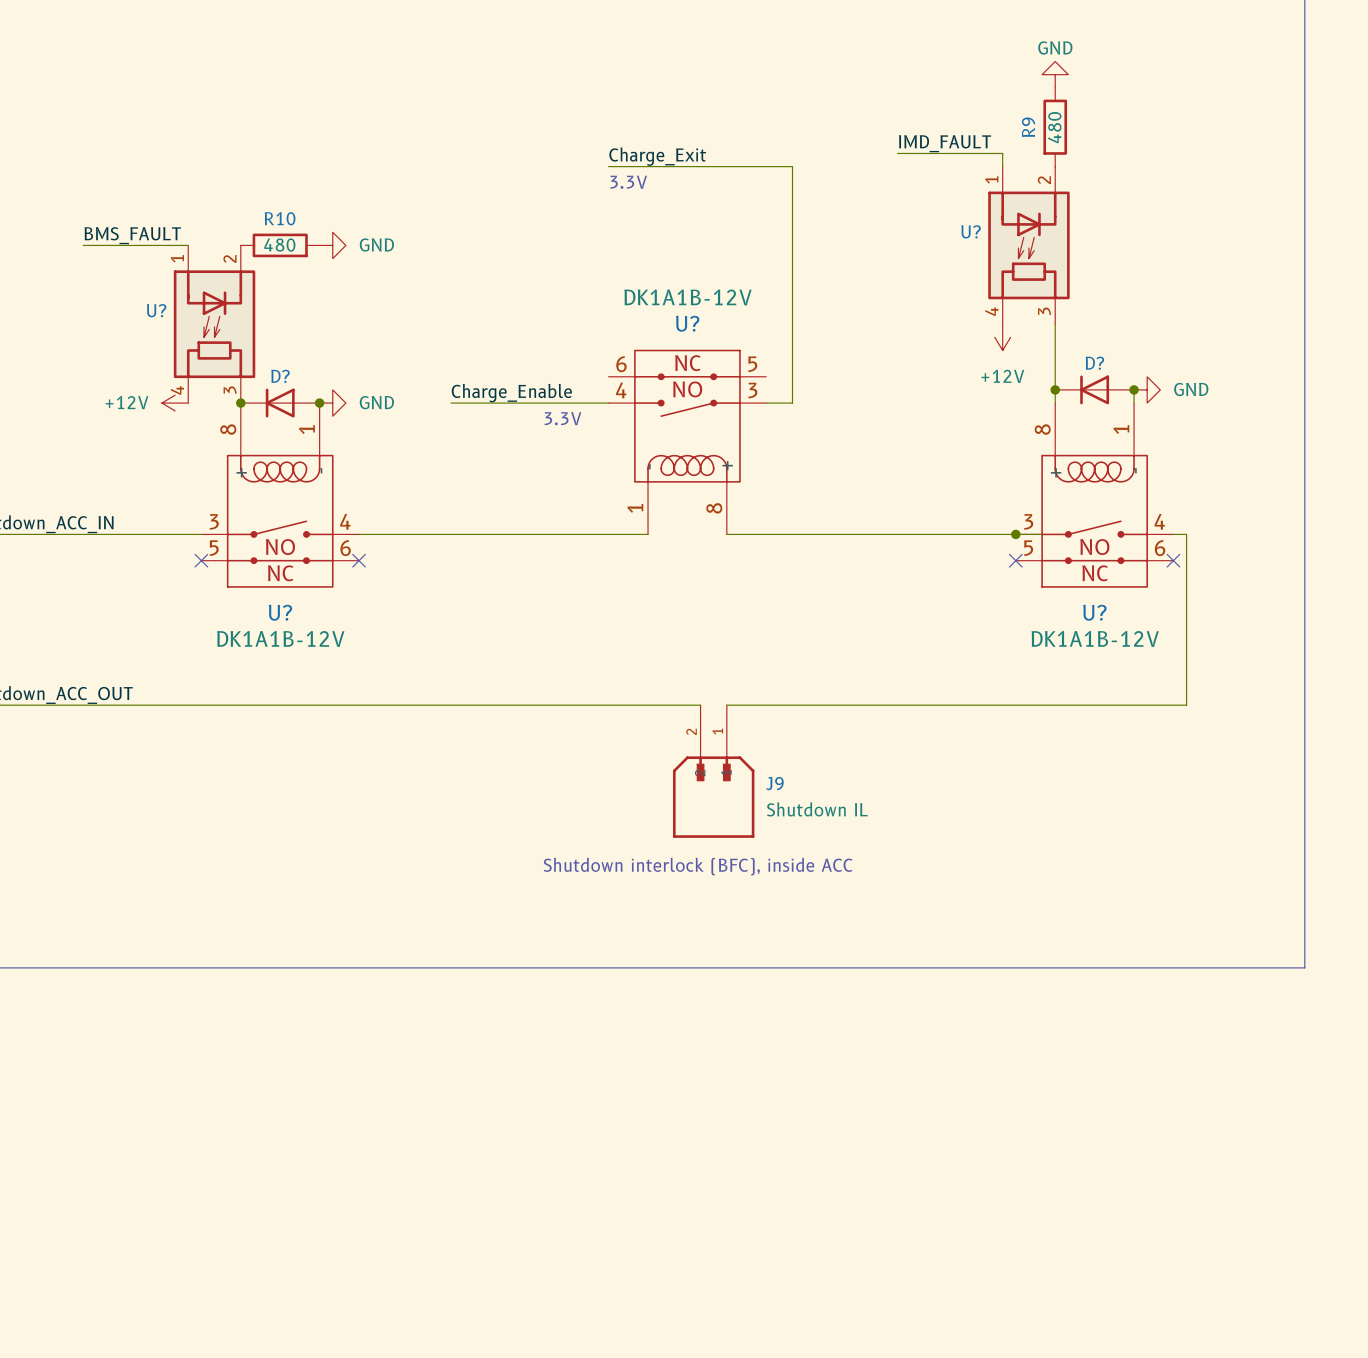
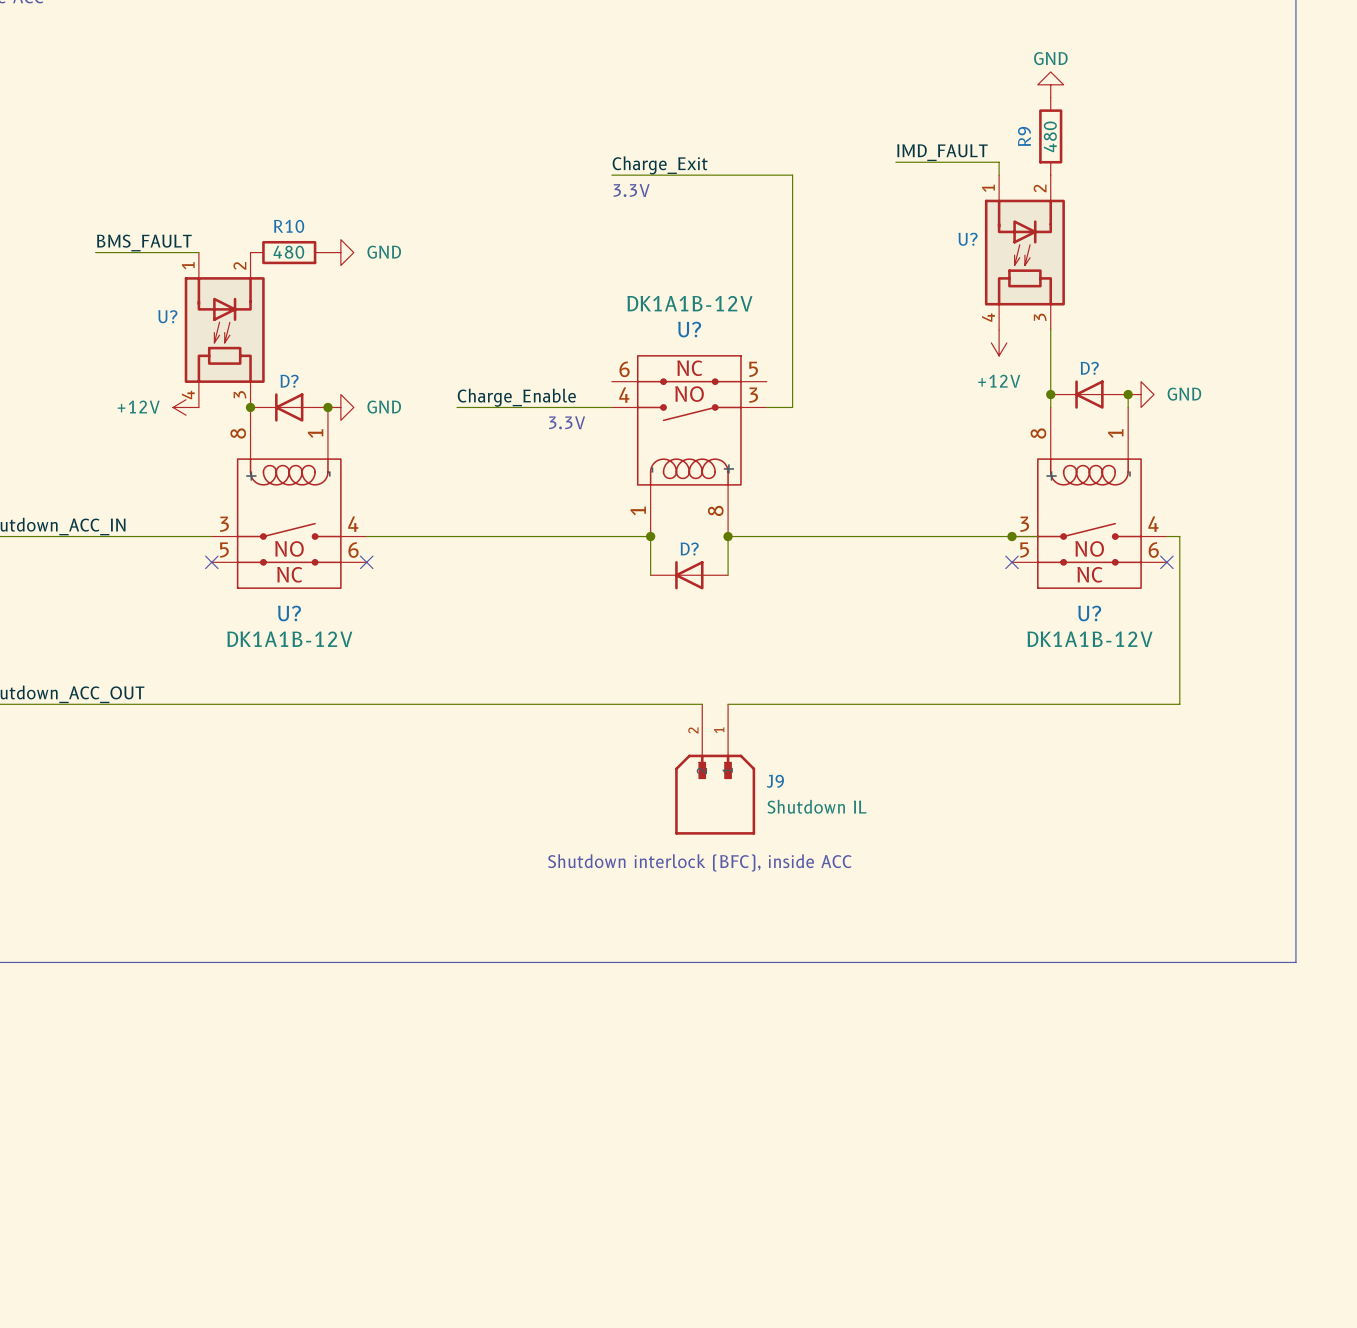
wire: none -> (650, 536) (650, 575)
junction: none -> (650, 536)
wire: none -> (728, 536) (728, 575)
junction: none -> (728, 536)
D?: none -> (689, 575)

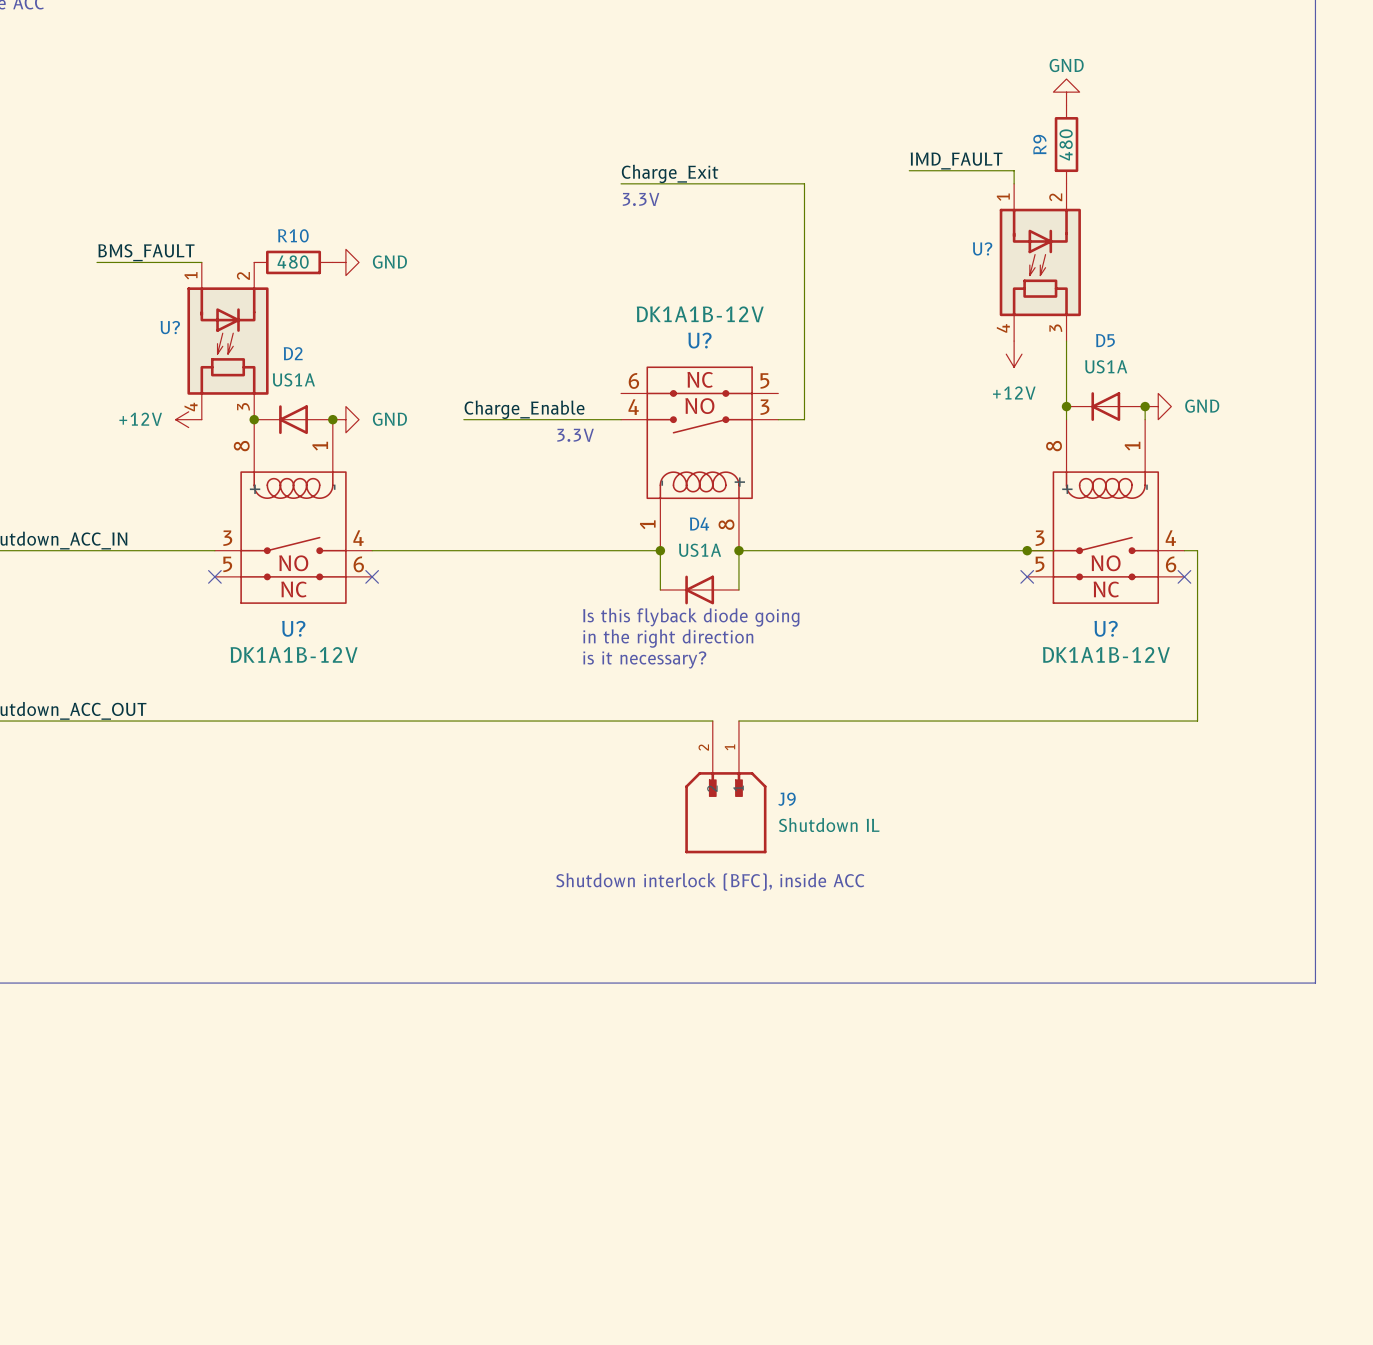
D? value: none -> US1A (1106, 366)
D? value: none -> US1A (293, 379)
D? name: D? (1089, 368) -> D5 (1105, 340)
D? name: D? (289, 381) -> D2 (293, 353)
D? value: none -> US1A (700, 550)
D? name: D? (689, 549) -> D4 (699, 523)
text: none -> Is this flyback diode going (691, 617)
text: none -> in the right direction (668, 638)
text: none -> is it necessary? (644, 659)

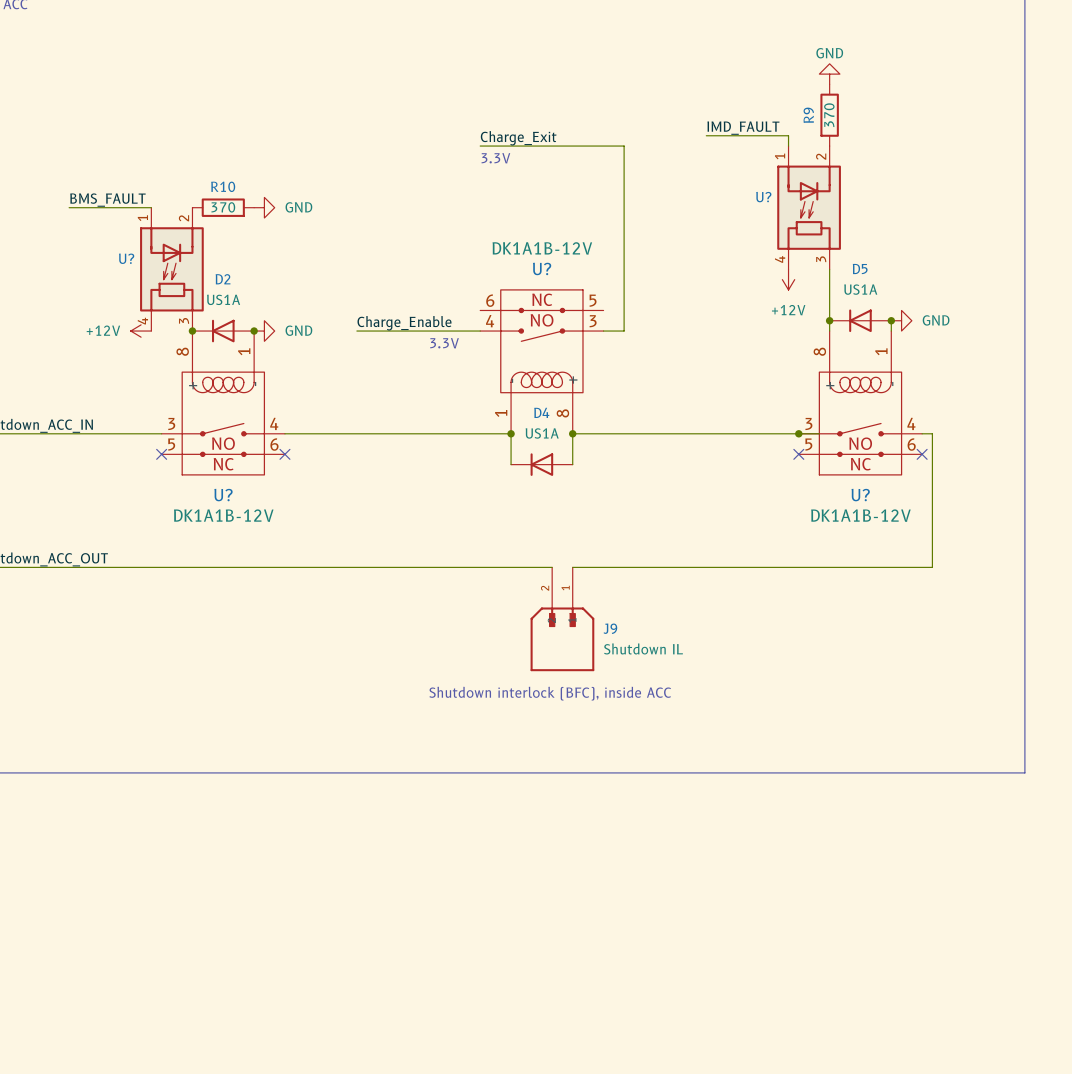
R9 value: 480 (1066, 144) -> 370 (829, 115)
R10 value: 480 (293, 262) -> 370 (223, 207)
text: Is this flyback diode going (691, 617) -> none
text: in the right direction (668, 638) -> none
text: is it necessary? (644, 659) -> none

